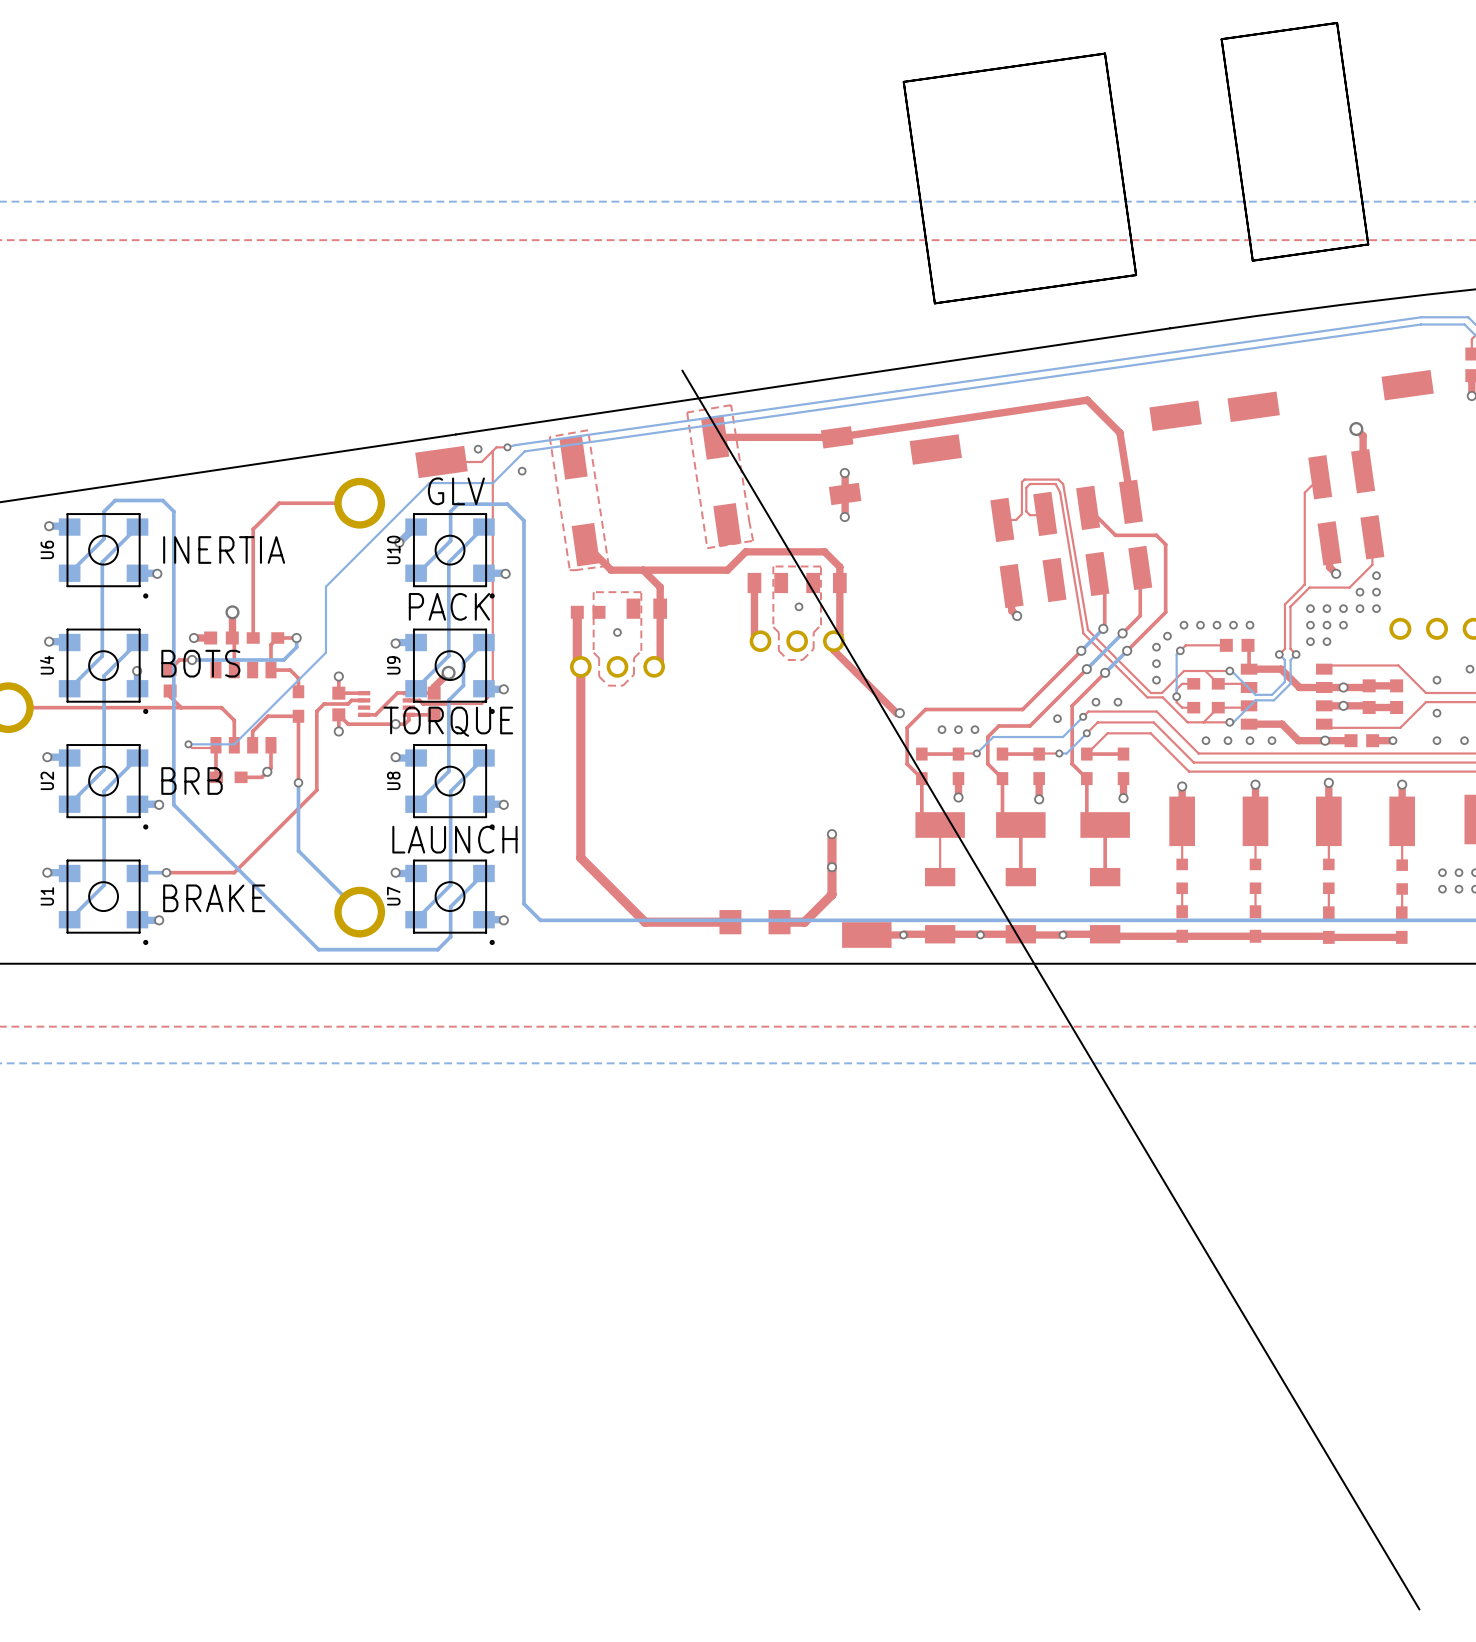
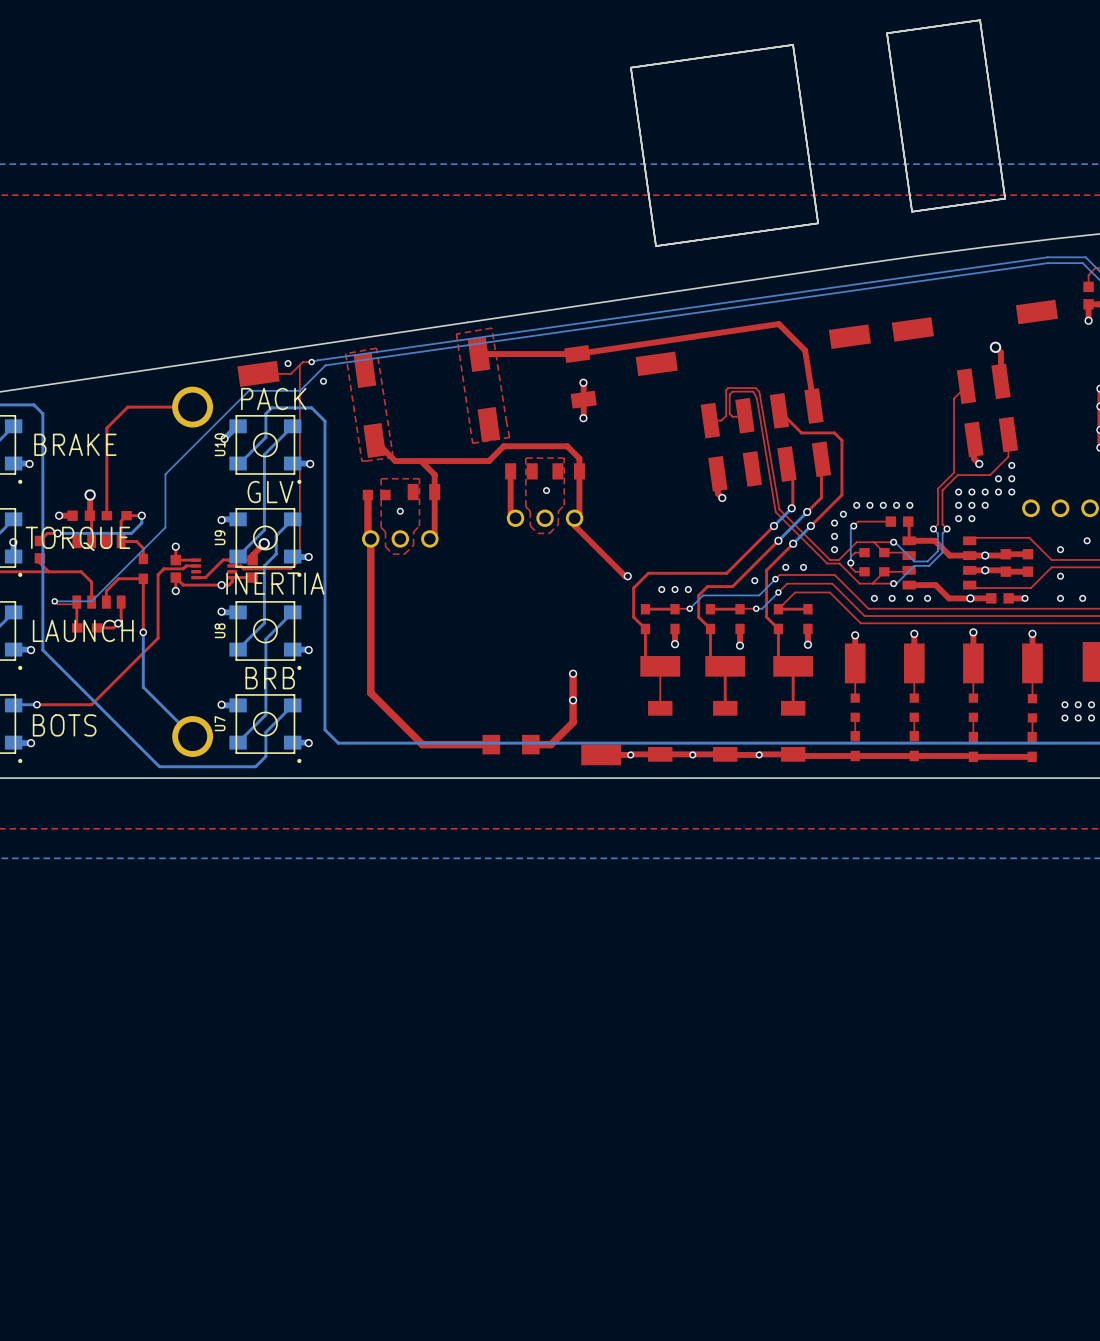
line: (682, 370) (1419, 1609) -> none
text: GLV (456, 491) -> PACK (273, 399)
text: INERTIA (224, 550) -> BRAKE (75, 444)
text: PACK (449, 606) -> none
text: none -> GLV (270, 492)
text: BOTS (200, 663) -> TORQUE (77, 538)
text: TORQUE (448, 721) -> none
text: none -> INERTIA (275, 583)
text: BRB (192, 781) -> LAUNCH (83, 630)
text: LAUNCH (454, 839) -> none
text: none -> BRB (270, 678)
text: BRAKE (214, 898) -> BOTS (64, 725)

